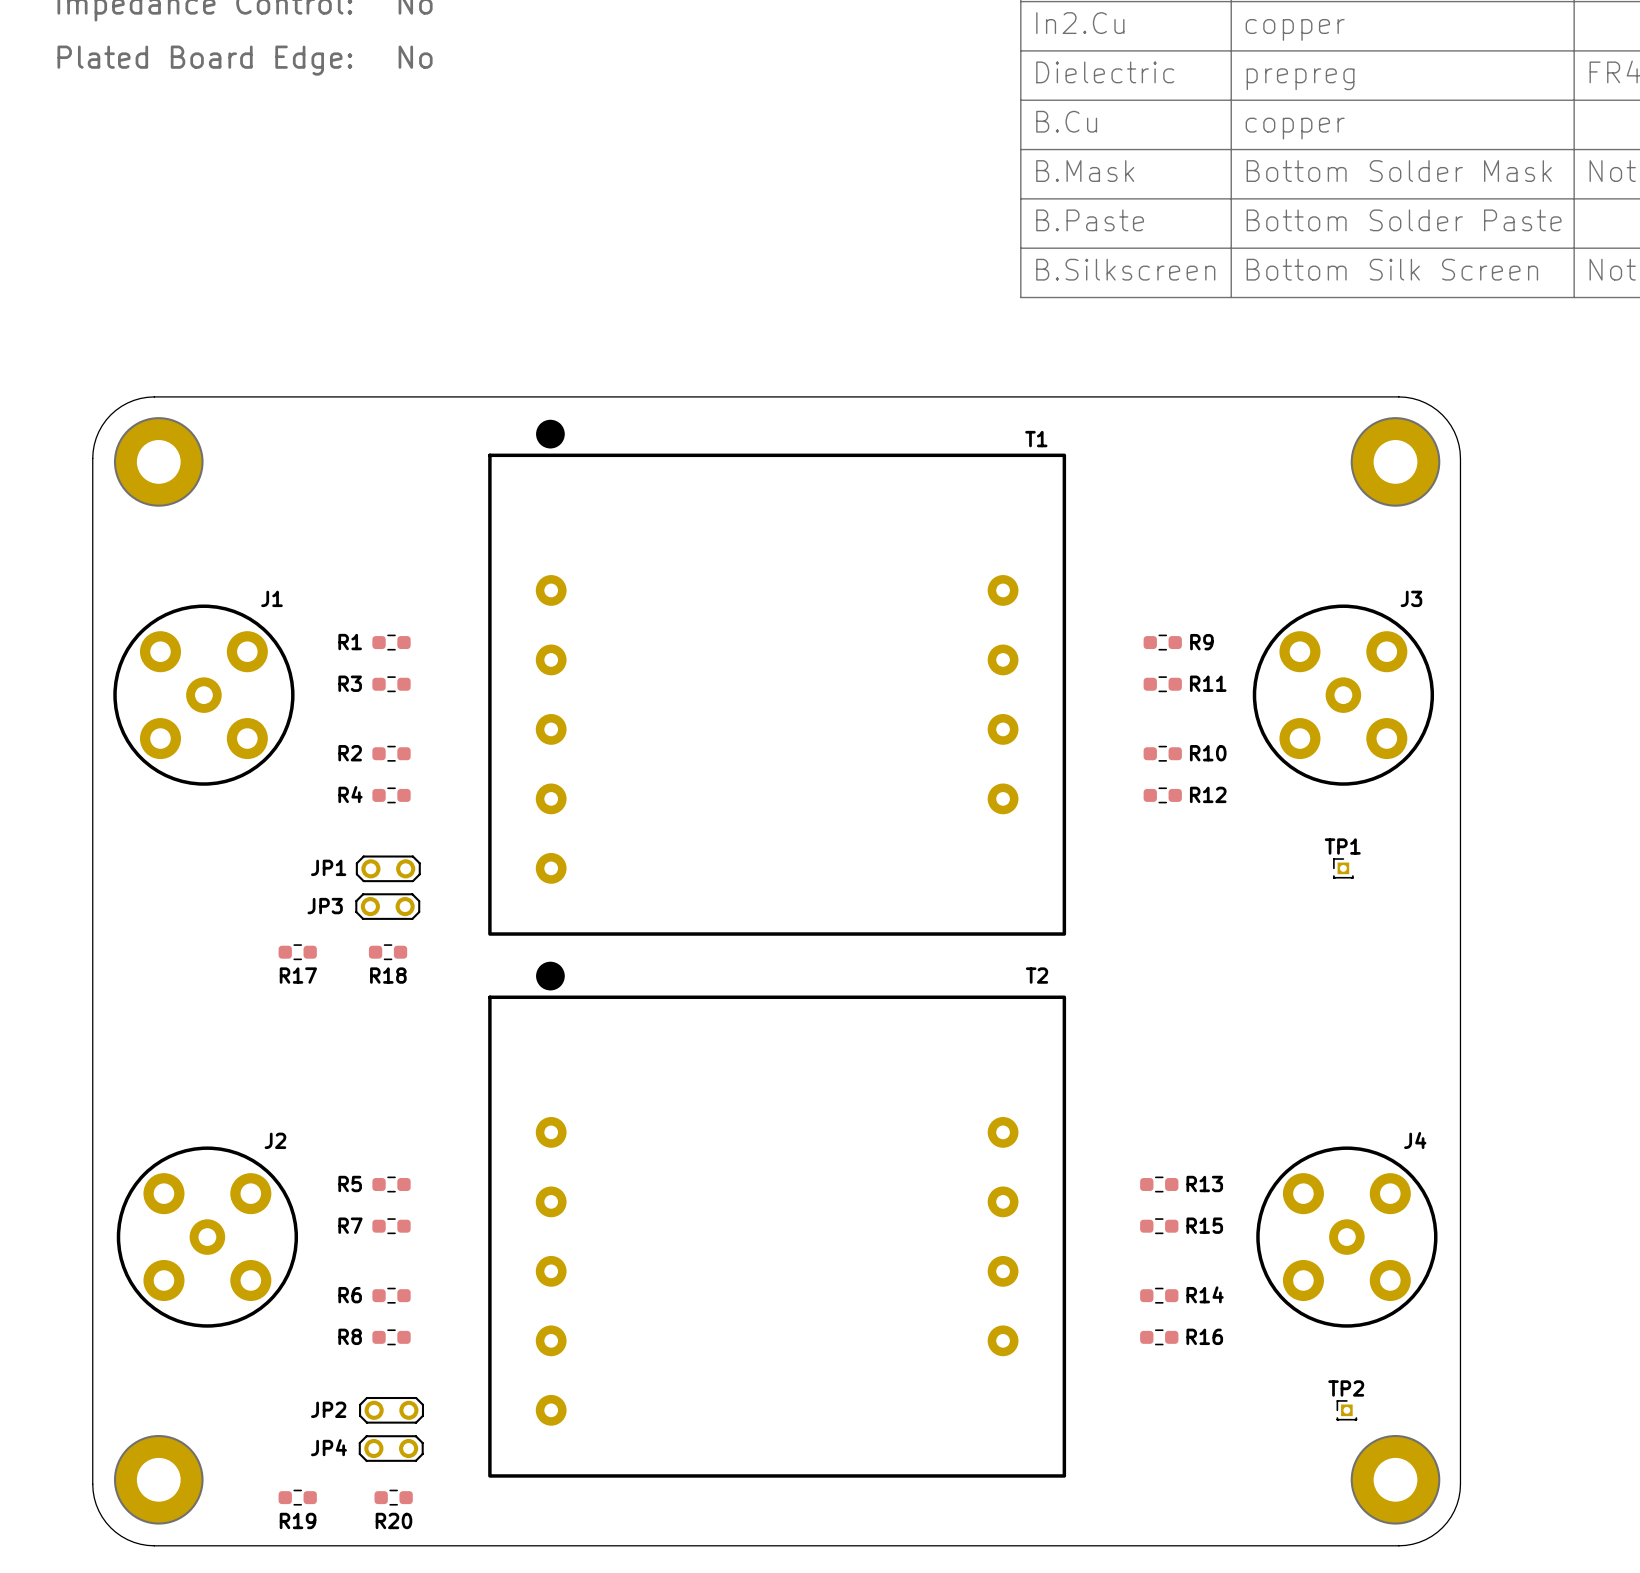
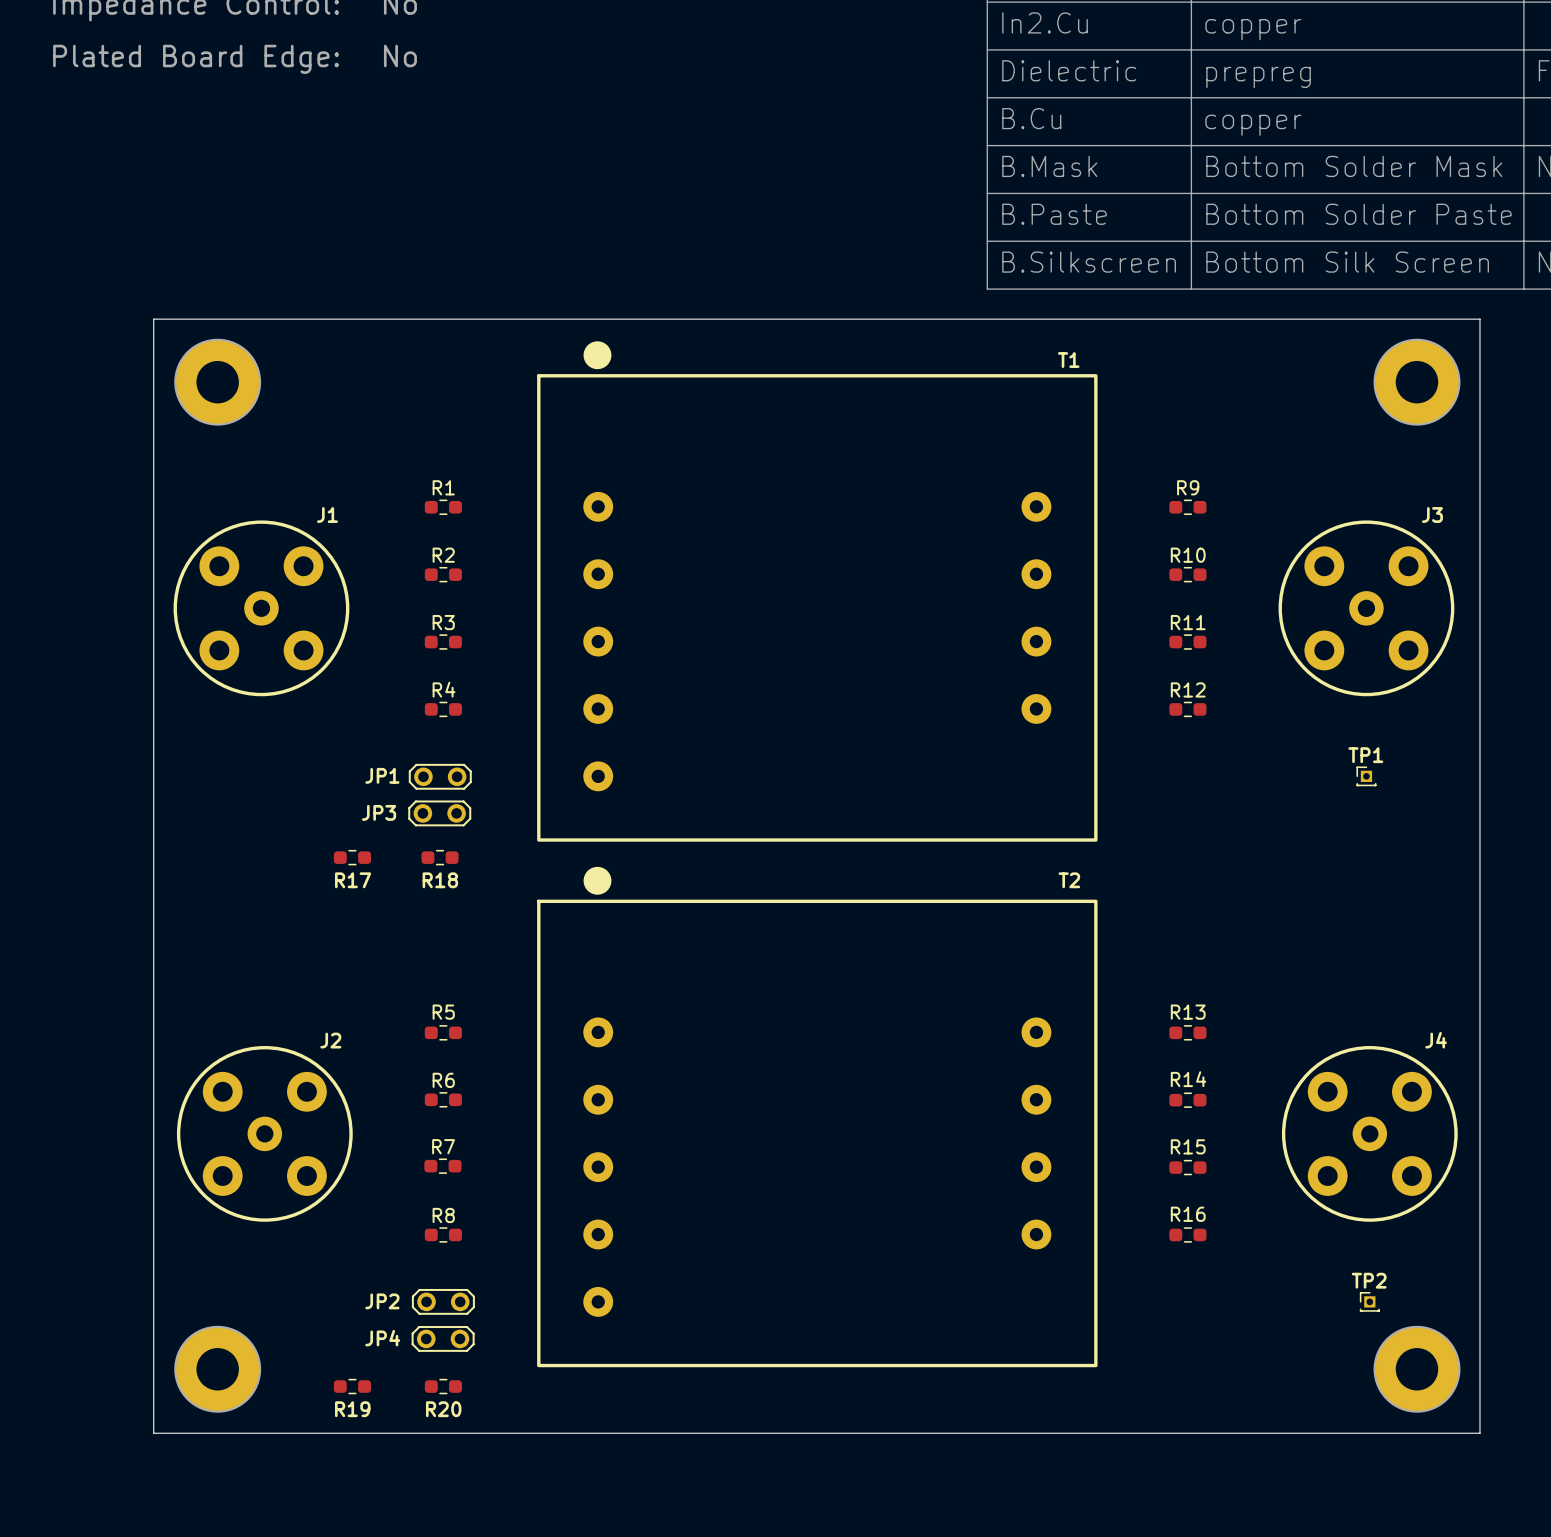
board edge: (154, 396) (1398, 396) (1419, 400) (1437, 410) (1447, 420) (1454, 431) (1458, 444) (1460, 458) (1460, 1484) (1457, 1504) (1447, 1522) (1437, 1532) (1425, 1539) (1412, 1544) (1398, 1545) (154, 1545) (133, 1542) (115, 1532) (106, 1522) (98, 1510) (94, 1497) (92, 1484) (92, 458) (94, 444) (98, 431) (110, 414) (121, 406) (133, 400) (154, 396) -> (153, 319) (153, 1433) (1479, 1433) (1479, 319) (153, 319)
part position: (158, 461) -> (217, 382)
part position: (1395, 461) -> (1416, 382)
R1 name position: R1 (350, 642) -> R1 (443, 487)
R1 position: (391, 642) -> (443, 507)
R9 position: (1162, 642) -> (1187, 507)
R9 name position: R9 (1201, 642) -> R9 (1188, 487)
T1 position: (777, 677) -> (817, 591)
R3 name position: R3 (350, 683) -> R3 (443, 622)
R11 name position: R11 (1208, 683) -> R11 (1188, 622)
R3 position: (391, 684) -> (443, 642)
R11 position: (1162, 684) -> (1187, 642)
J1 position: (203, 695) -> (261, 608)
J3 position: (1343, 695) -> (1366, 608)
R2 name position: R2 (350, 753) -> R2 (443, 555)
R2 position: (391, 753) -> (443, 574)
R10 position: (1162, 753) -> (1187, 574)
R10 name position: R10 (1208, 753) -> R10 (1188, 555)
R4 name position: R4 (350, 794) -> R4 (444, 689)
R12 name position: R12 (1208, 794) -> R12 (1188, 689)
R4 position: (391, 795) -> (443, 709)
R12 position: (1162, 795) -> (1187, 709)
JP1 position: (388, 868) -> (440, 776)
TP1 position: (1343, 868) -> (1366, 776)
JP3 position: (387, 906) -> (439, 813)
R17 position: (297, 952) -> (352, 857)
R18 position: (388, 952) -> (440, 857)
R5 name position: R5 (350, 1183) -> R5 (443, 1012)
R13 name position: R13 (1204, 1183) -> R13 (1188, 1012)
R5 position: (391, 1184) -> (443, 1032)
R13 position: (1159, 1184) -> (1187, 1032)
T2 position: (777, 1219) -> (817, 1117)
R7 name position: R7 (350, 1225) -> R7 (443, 1146)
R15 name position: R15 (1204, 1225) -> R15 (1188, 1146)
R7 position: (391, 1226) -> (442, 1166)
R15 position: (1159, 1226) -> (1187, 1167)
J2 position: (207, 1237) -> (264, 1133)
J4 position: (1346, 1237) -> (1369, 1133)
R14 name position: R14 (1205, 1294) -> R14 (1188, 1079)
R6 name position: R6 (350, 1295) -> R6 (443, 1080)
R6 position: (391, 1295) -> (443, 1099)
R14 position: (1159, 1295) -> (1187, 1100)
R8 name position: R8 (350, 1336) -> R8 (443, 1215)
R16 name position: R16 (1204, 1336) -> R16 (1188, 1214)
R8 position: (391, 1337) -> (443, 1234)
R16 position: (1159, 1337) -> (1187, 1234)
JP2 position: (391, 1410) -> (443, 1301)
TP2 position: (1346, 1410) -> (1369, 1301)
JP4 position: (391, 1448) -> (443, 1338)
part position: (158, 1479) -> (217, 1369)
part position: (1395, 1479) -> (1416, 1369)
R19 position: (297, 1497) -> (352, 1386)
R20 position: (393, 1497) -> (443, 1386)

